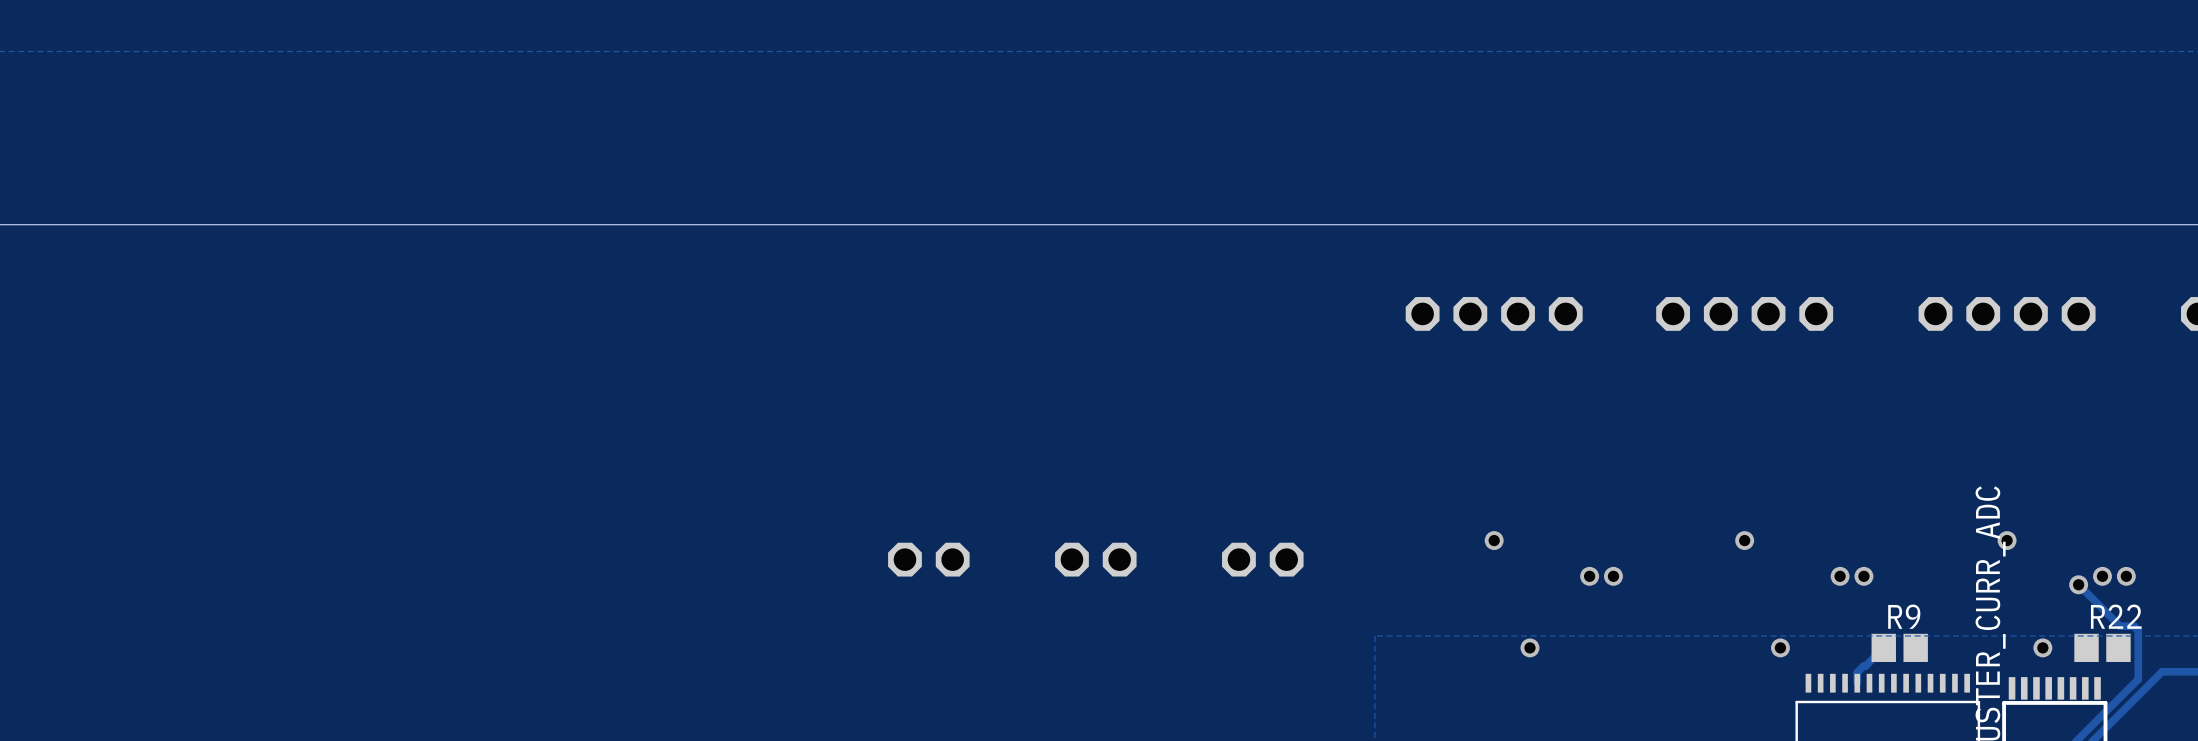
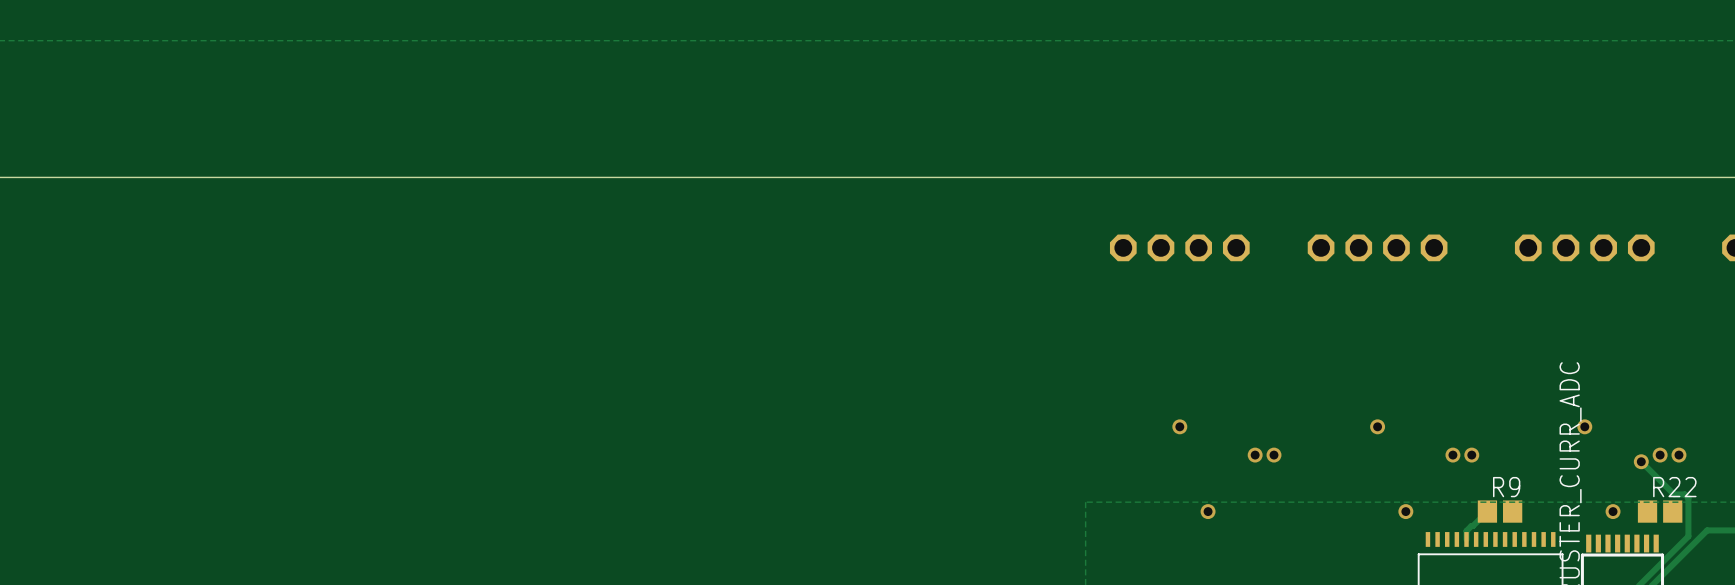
part: (928, 559) -> none
part: (1095, 559) -> none
part: (1262, 559) -> none

